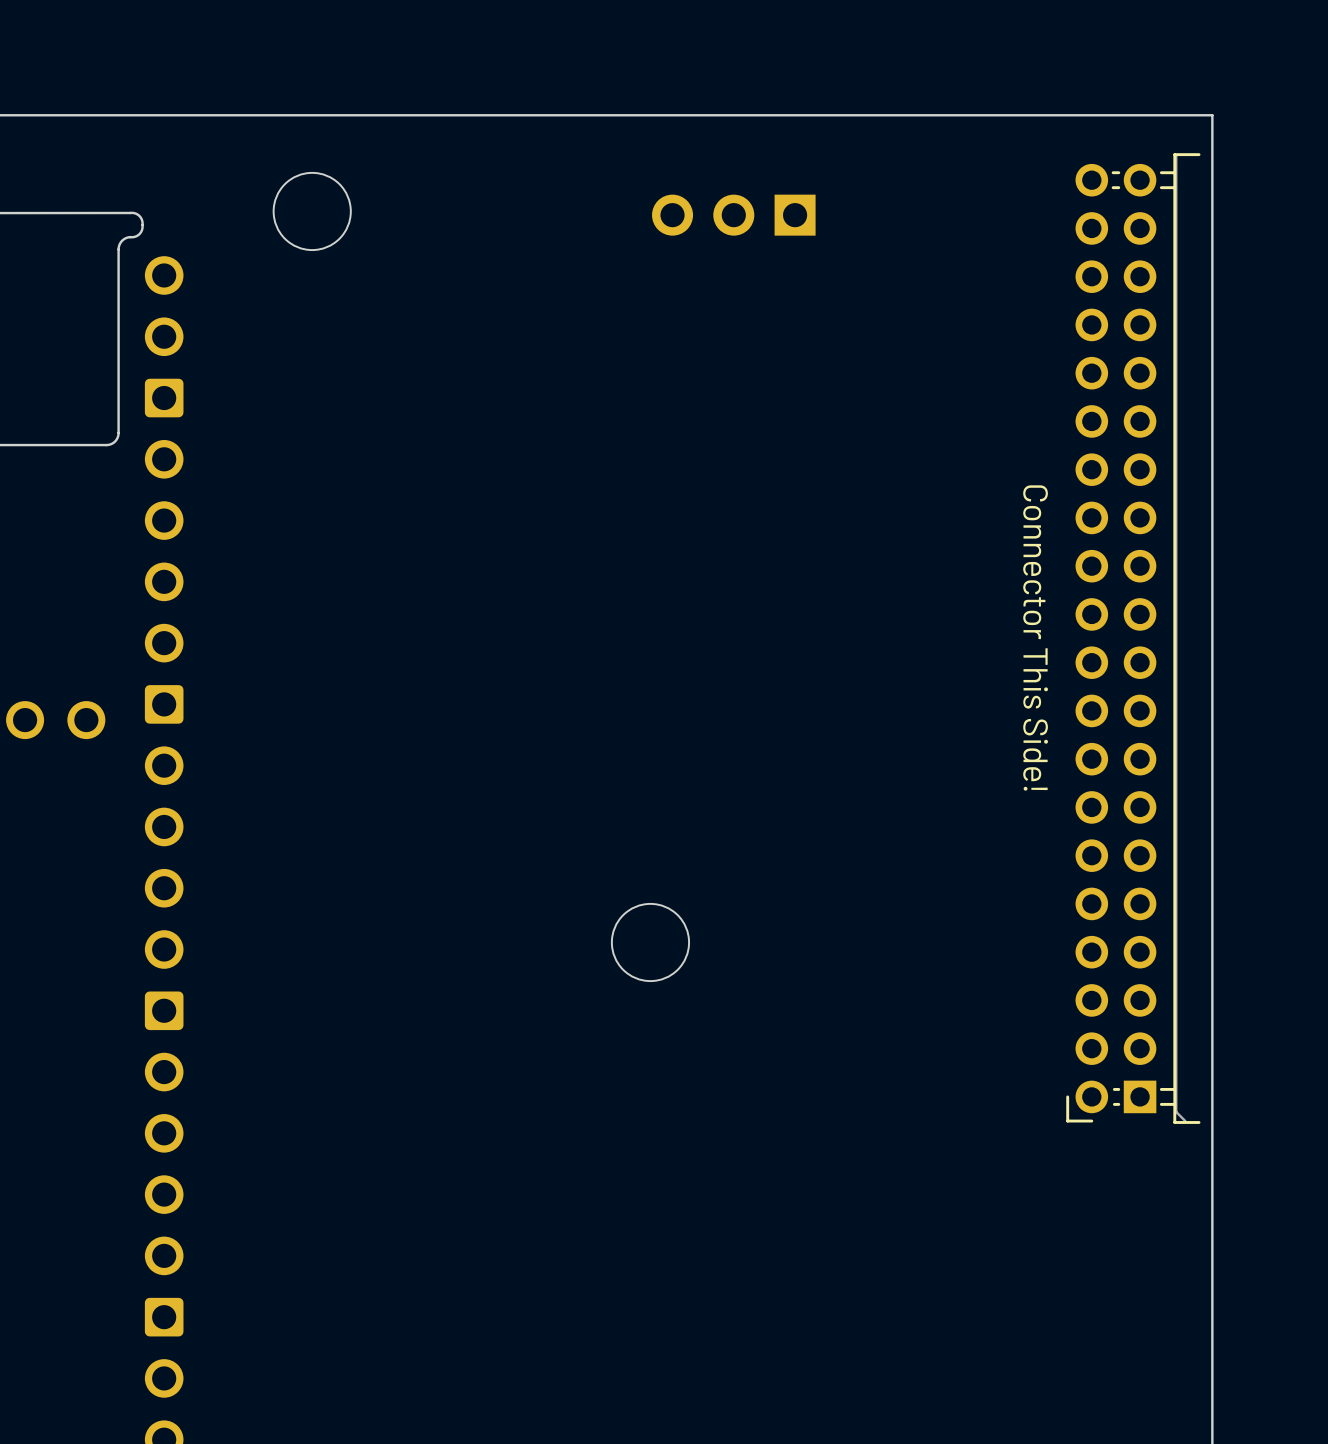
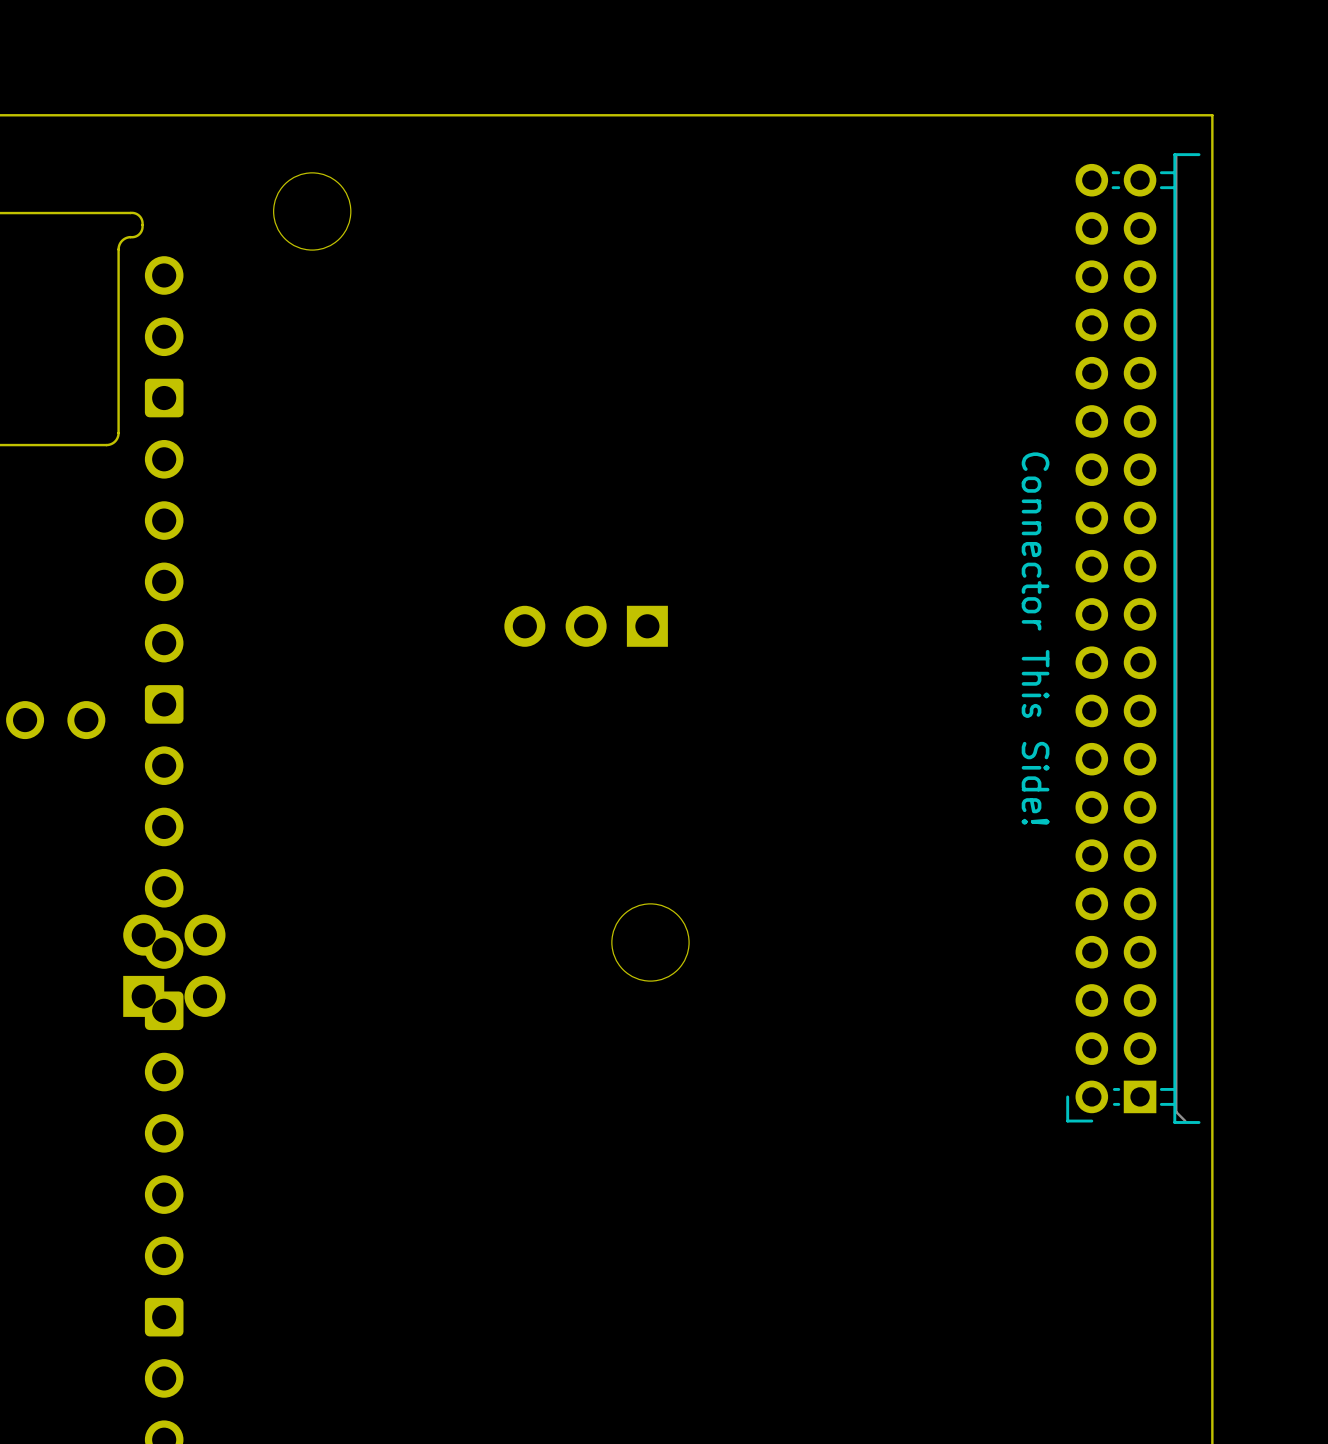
part position: (733, 215) -> (586, 626)
part: none -> (174, 965)

